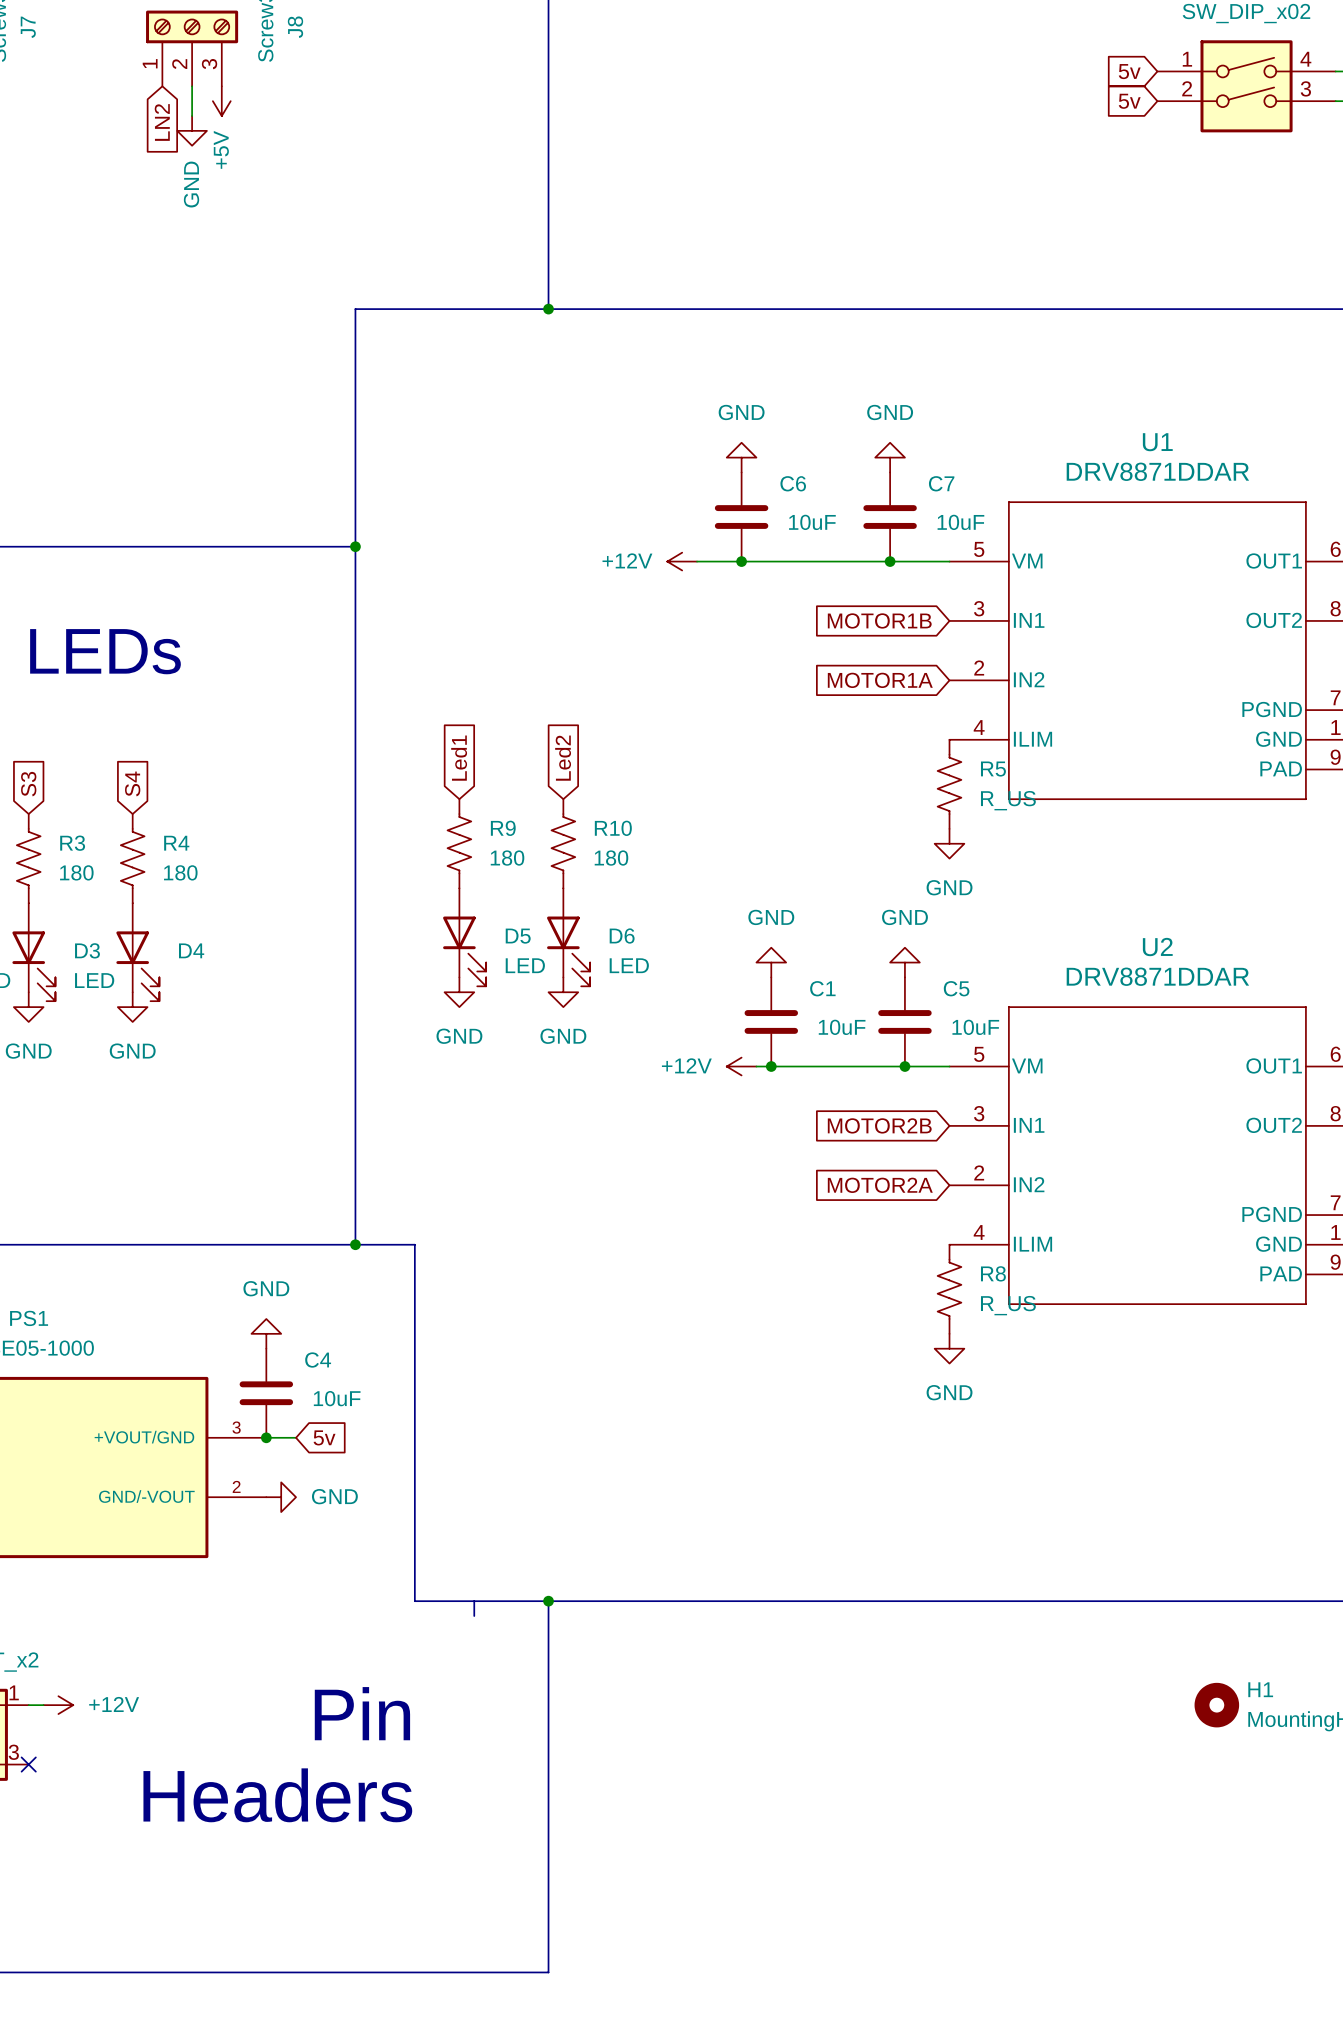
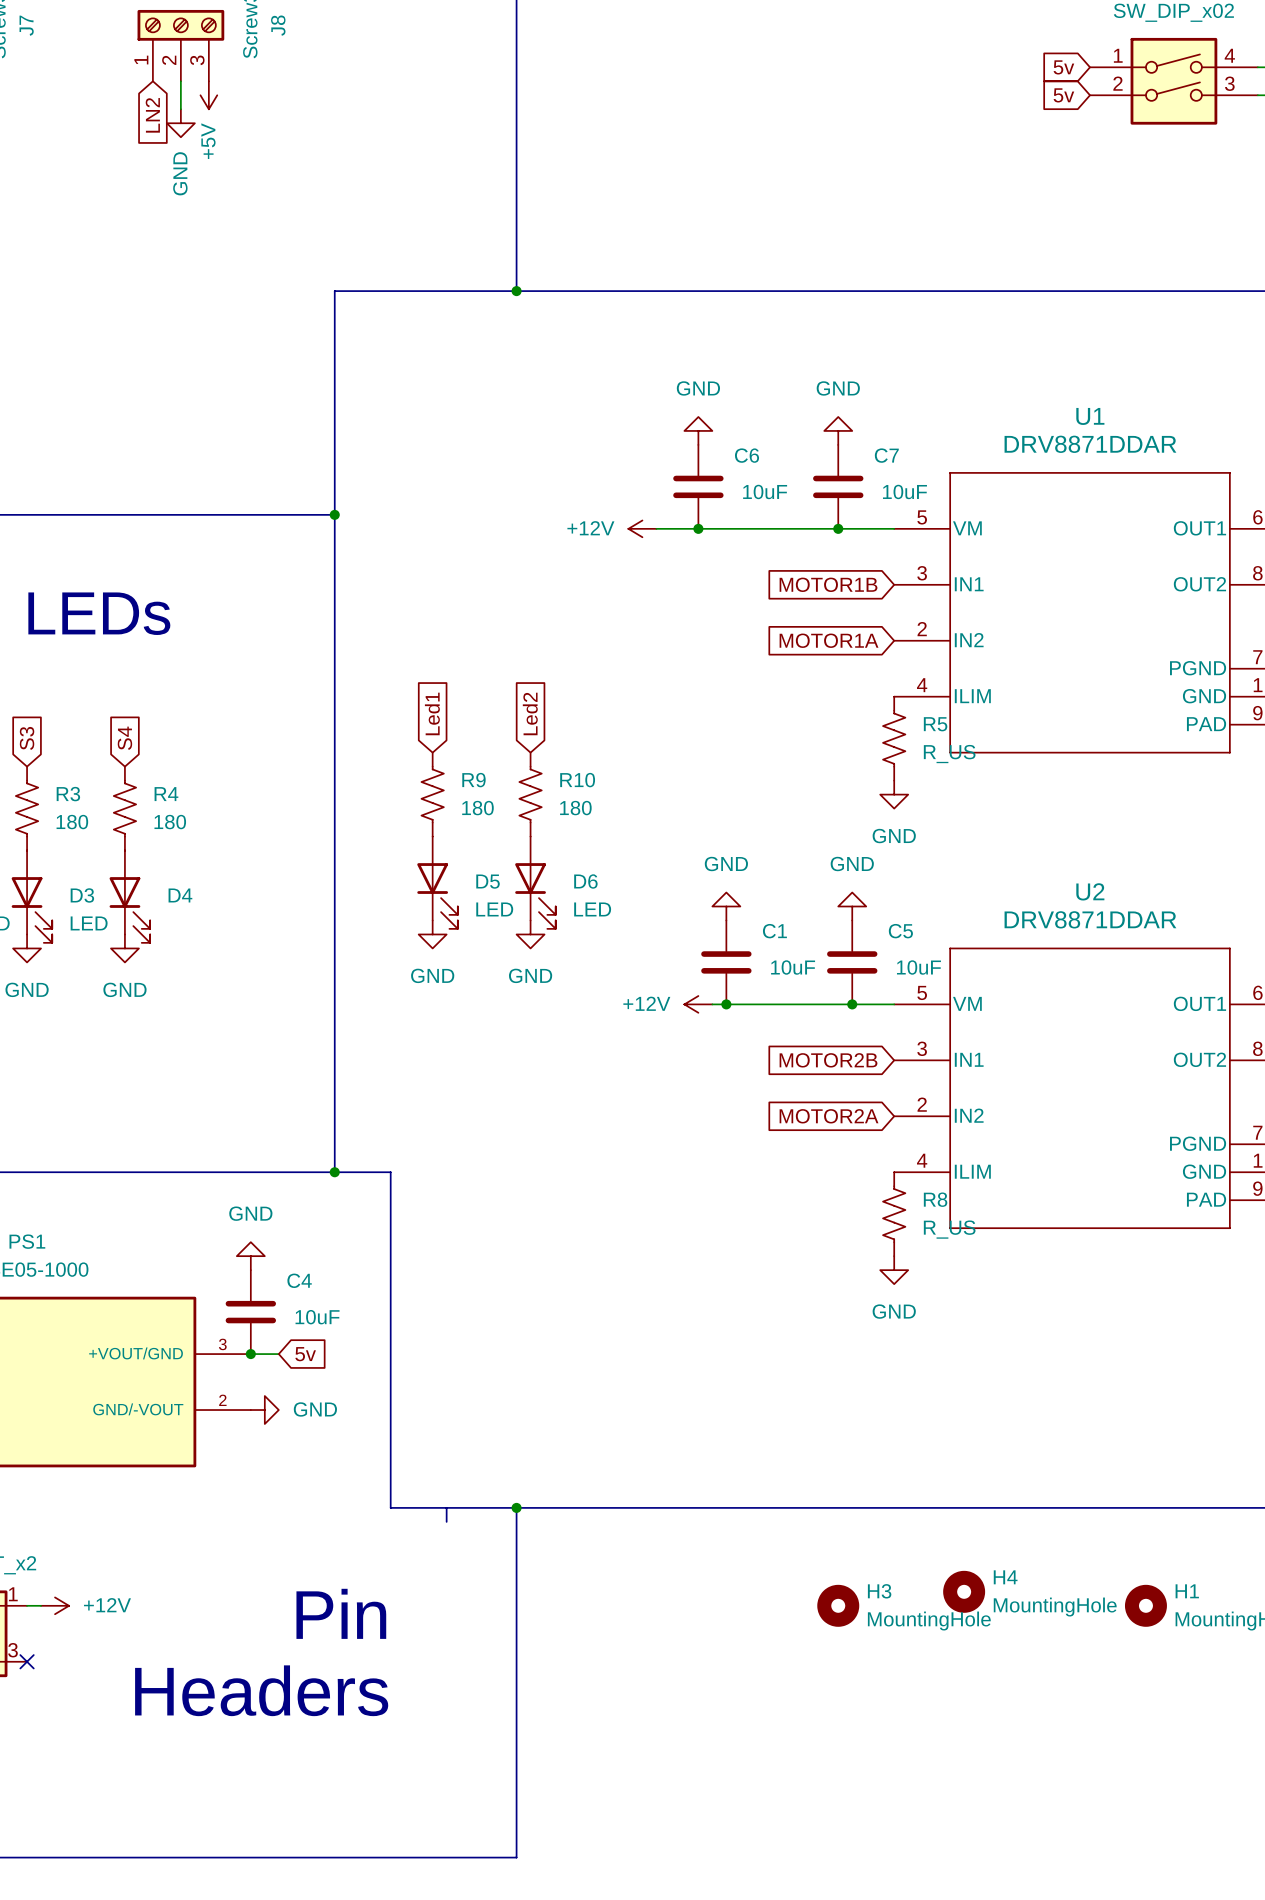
H4: none -> MountingHole (964, 1591)
H3: none -> MountingHole (838, 1605)

